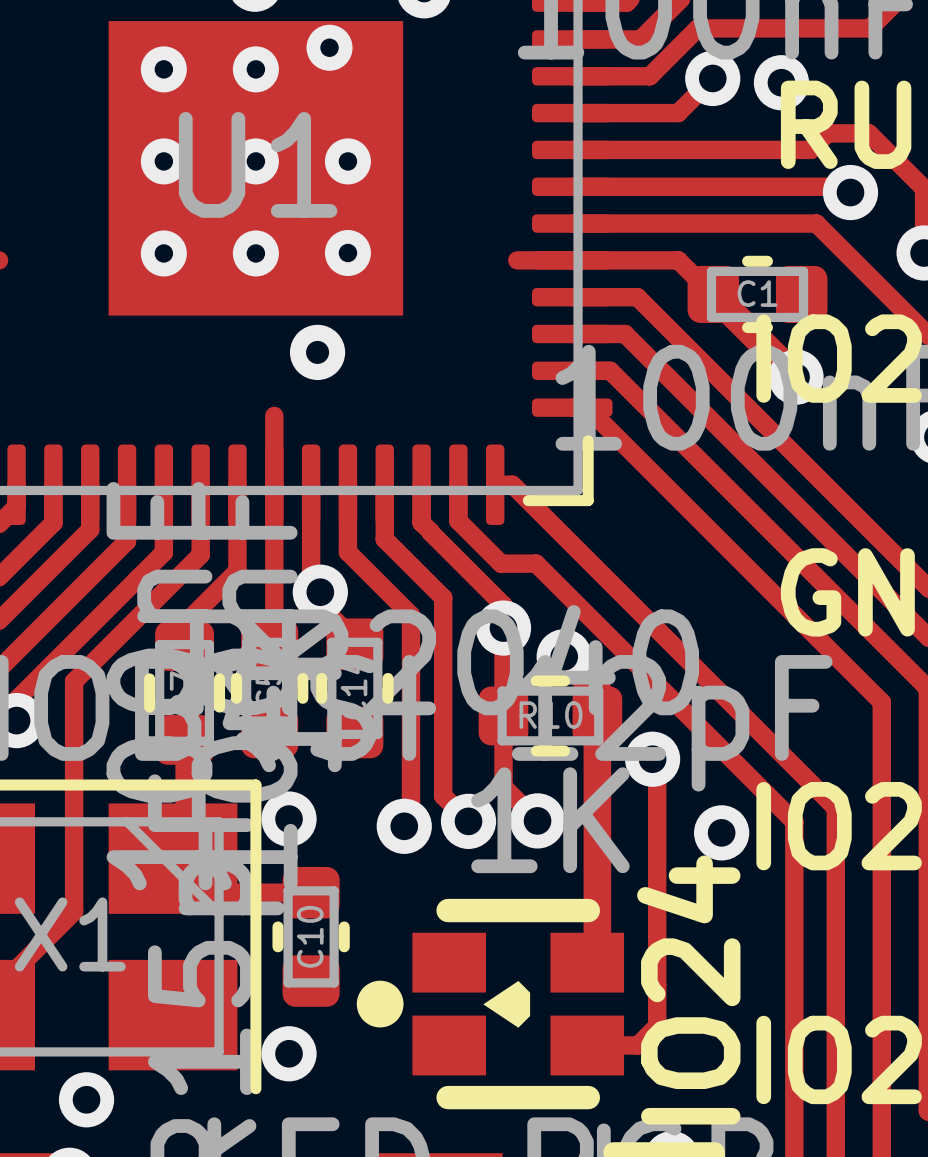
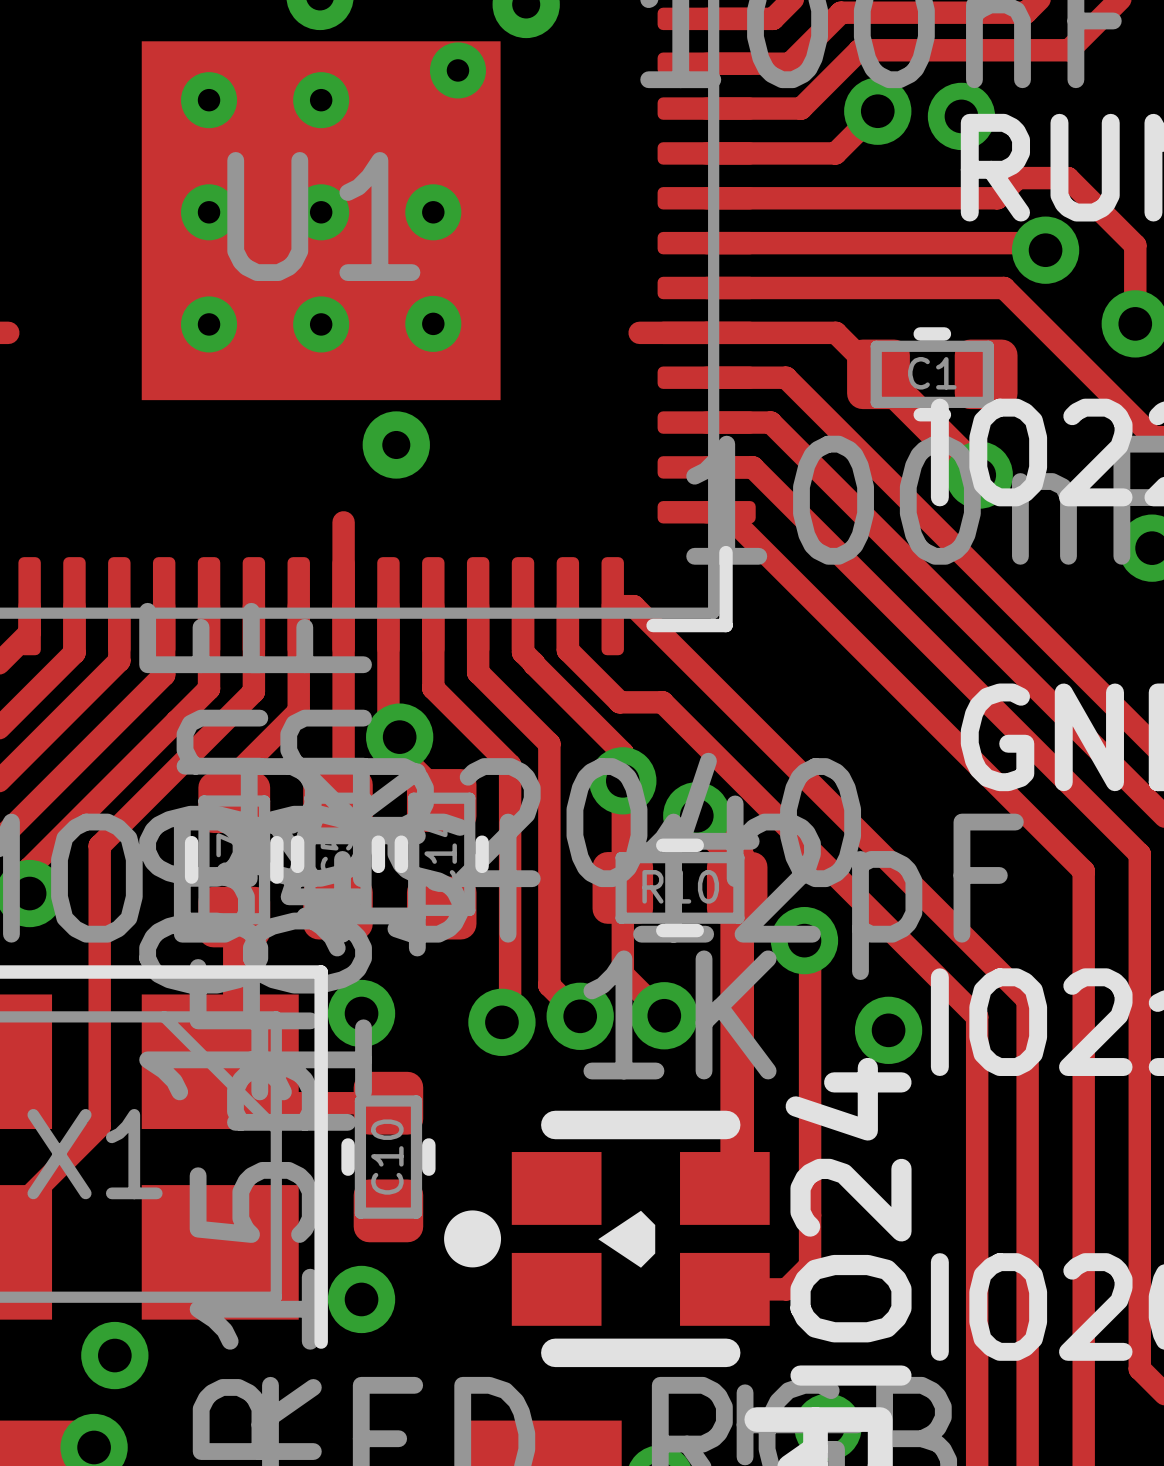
via position: (329, 47) -> (457, 70)

